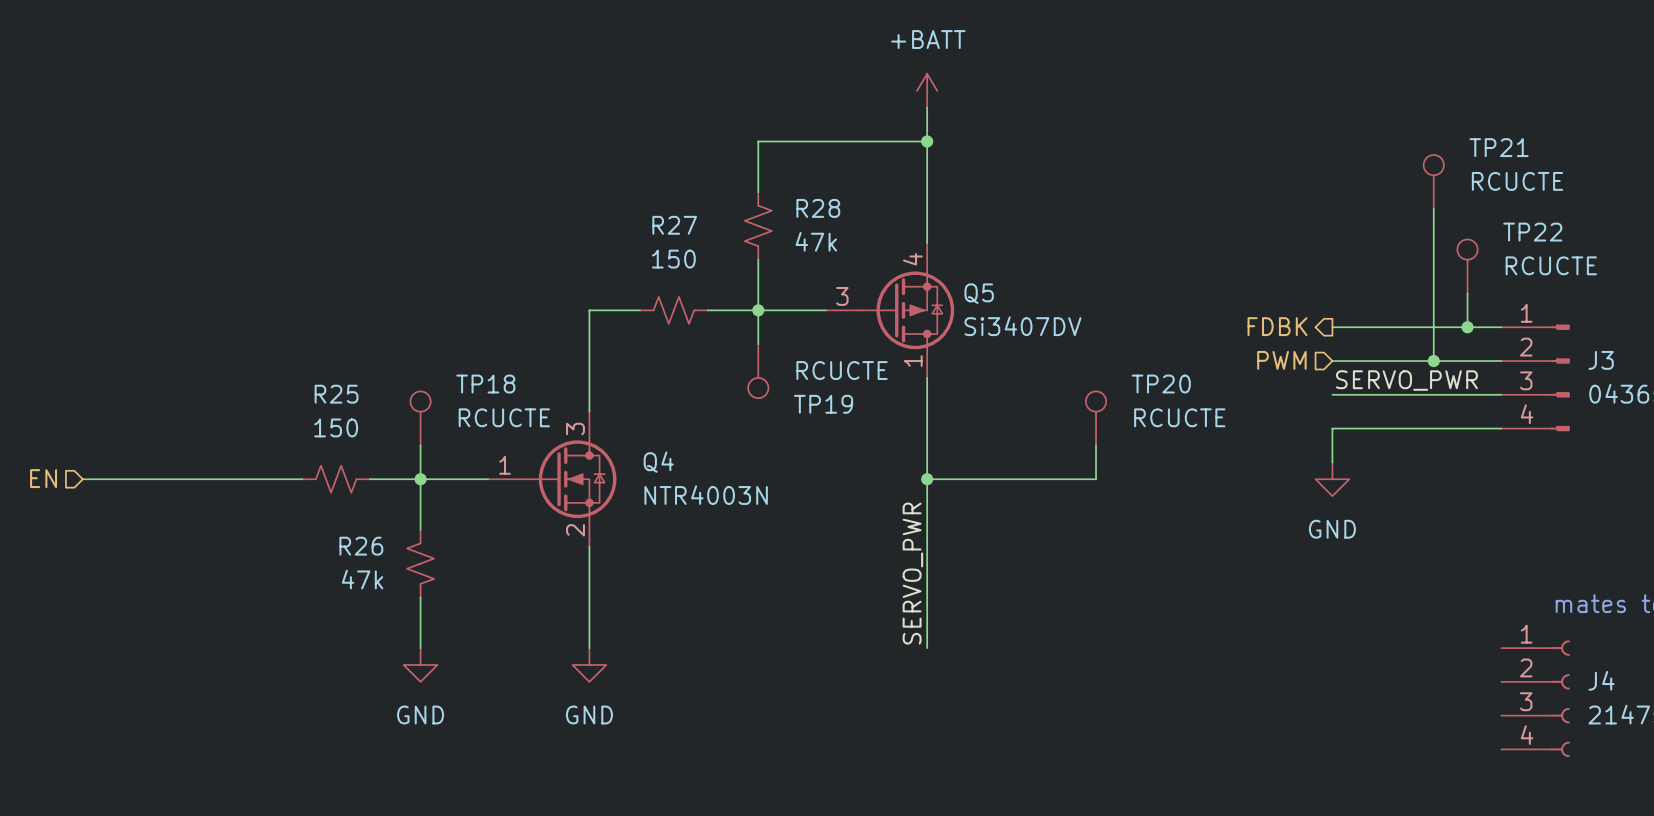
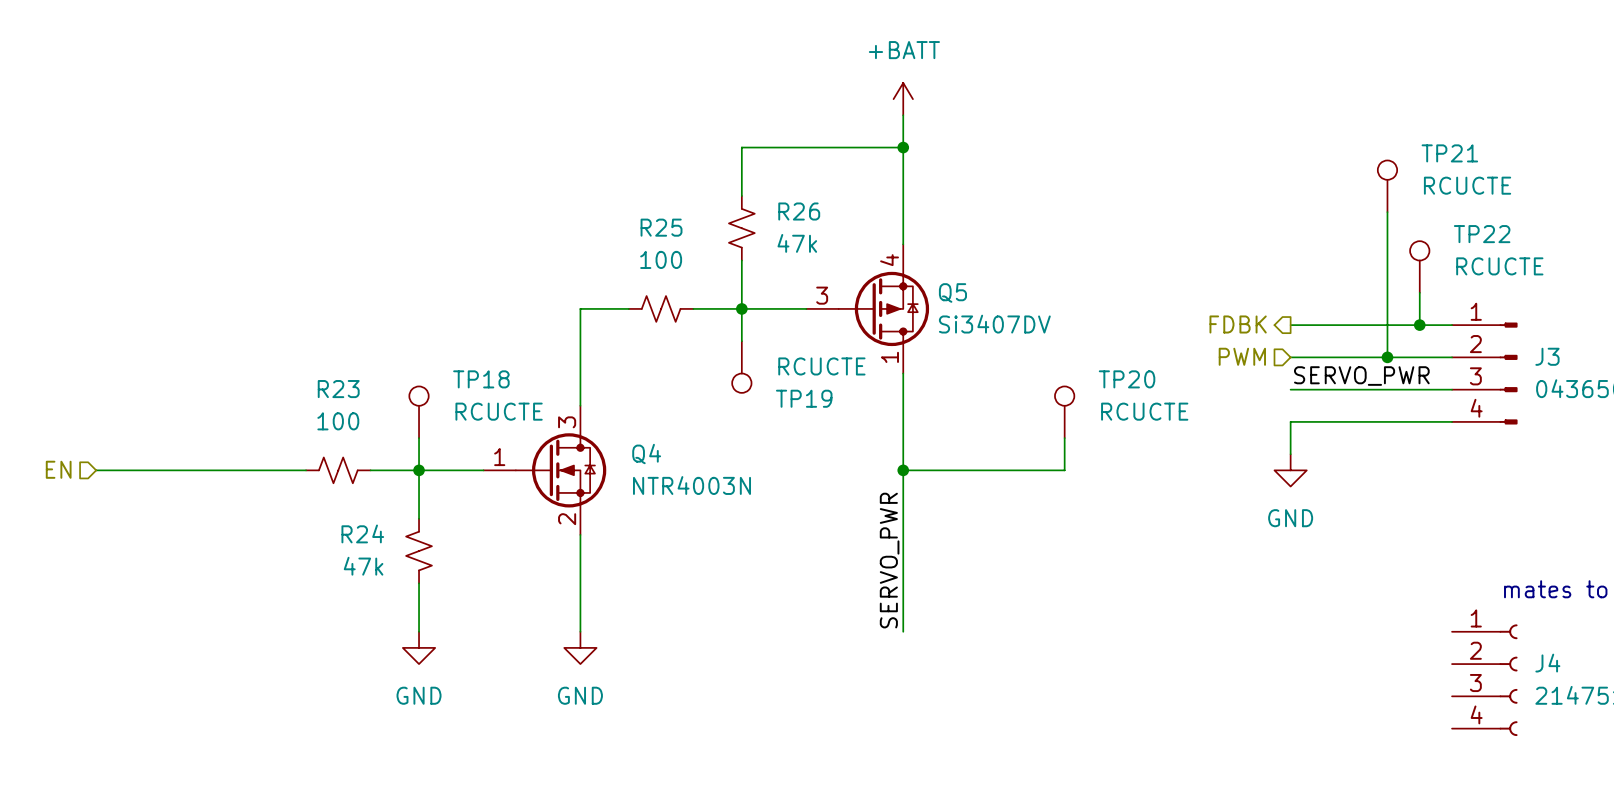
R28 name: R28 (818, 208) -> R26 (799, 211)
R27 name: R27 (674, 225) -> R25 (661, 227)
R27 value: 150 (673, 259) -> 100 (661, 259)
R25 name: R25 (336, 394) -> R23 (338, 389)
R25 value: 150 (336, 427) -> 100 (338, 421)
R26 name: R26 (361, 546) -> R24 (362, 533)

